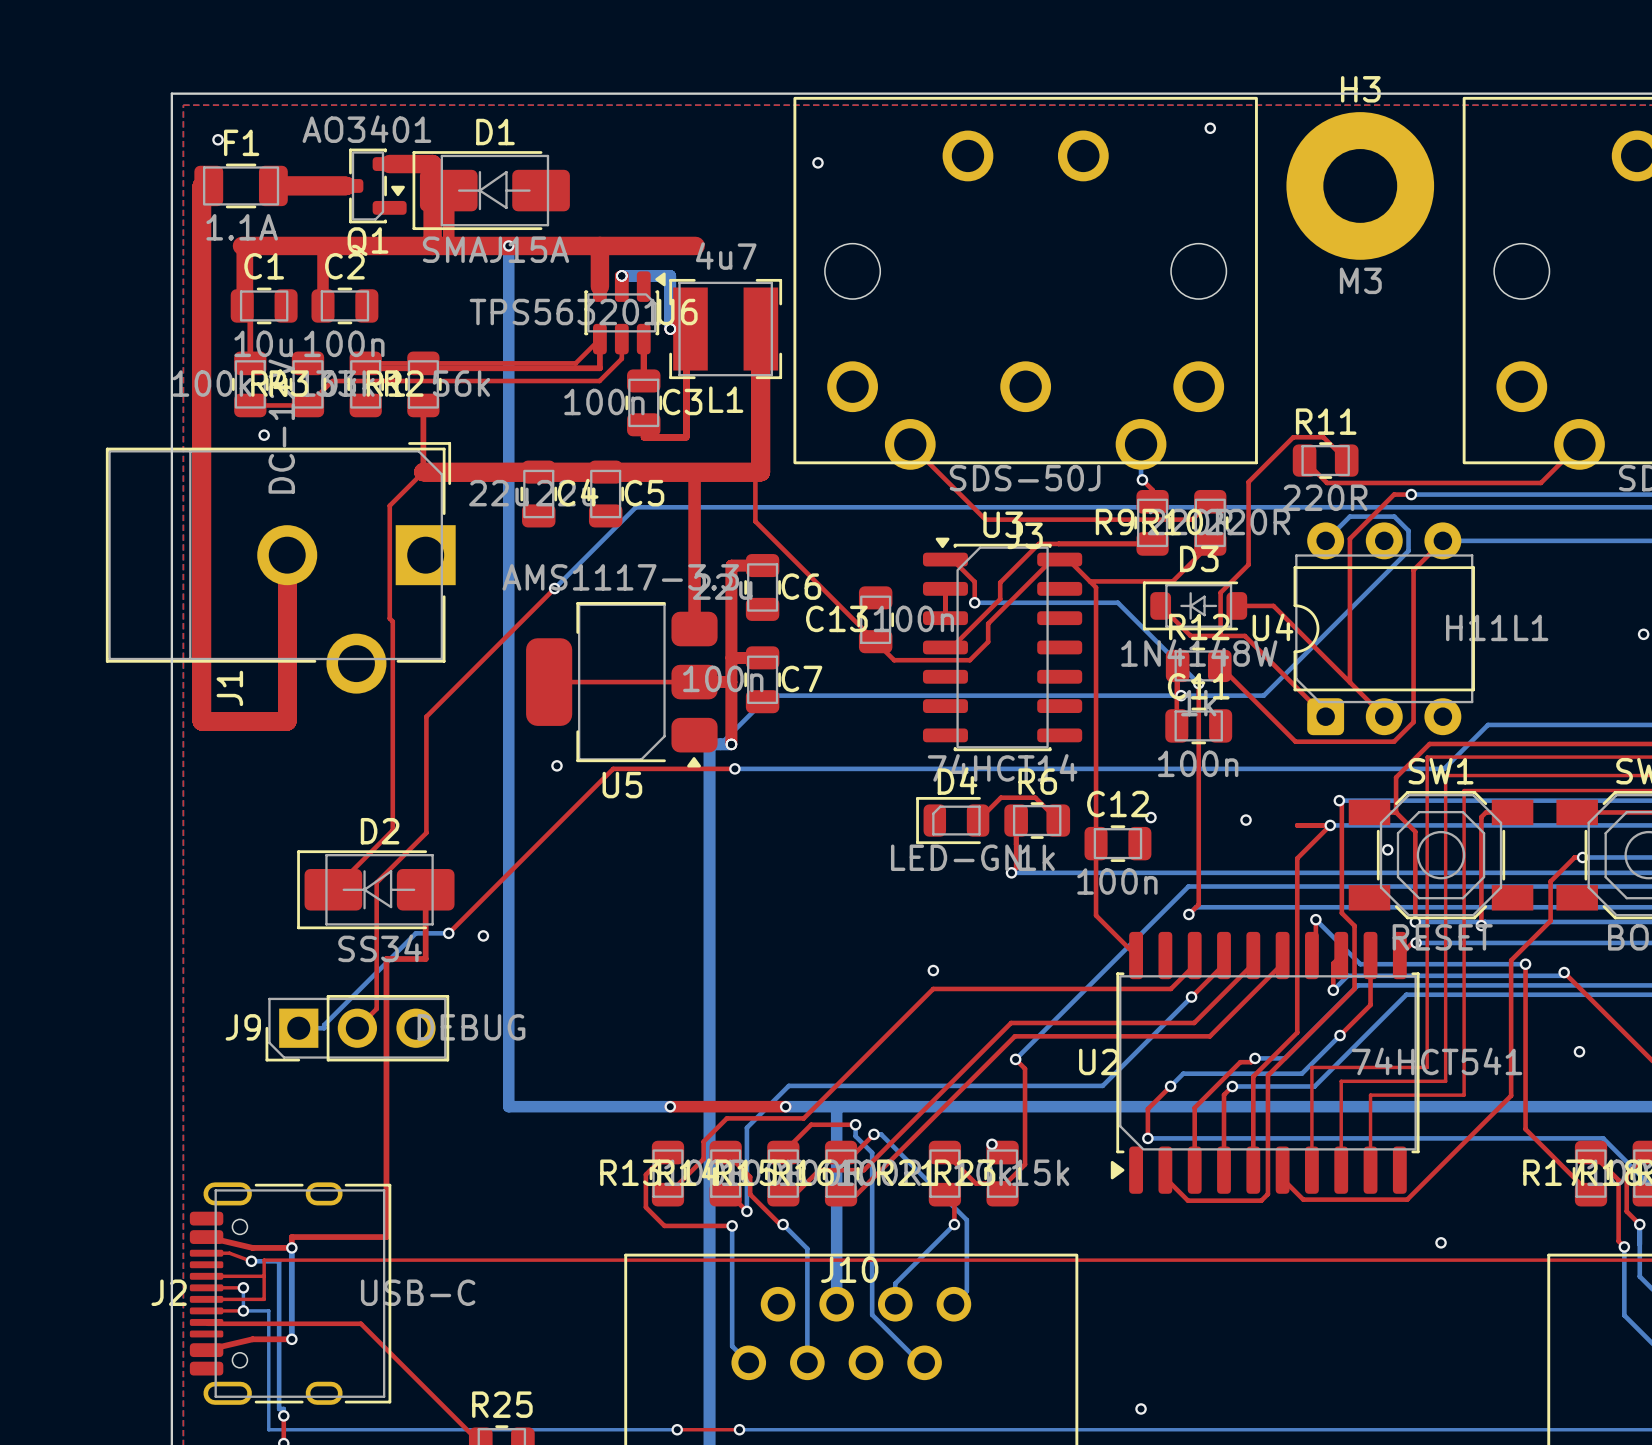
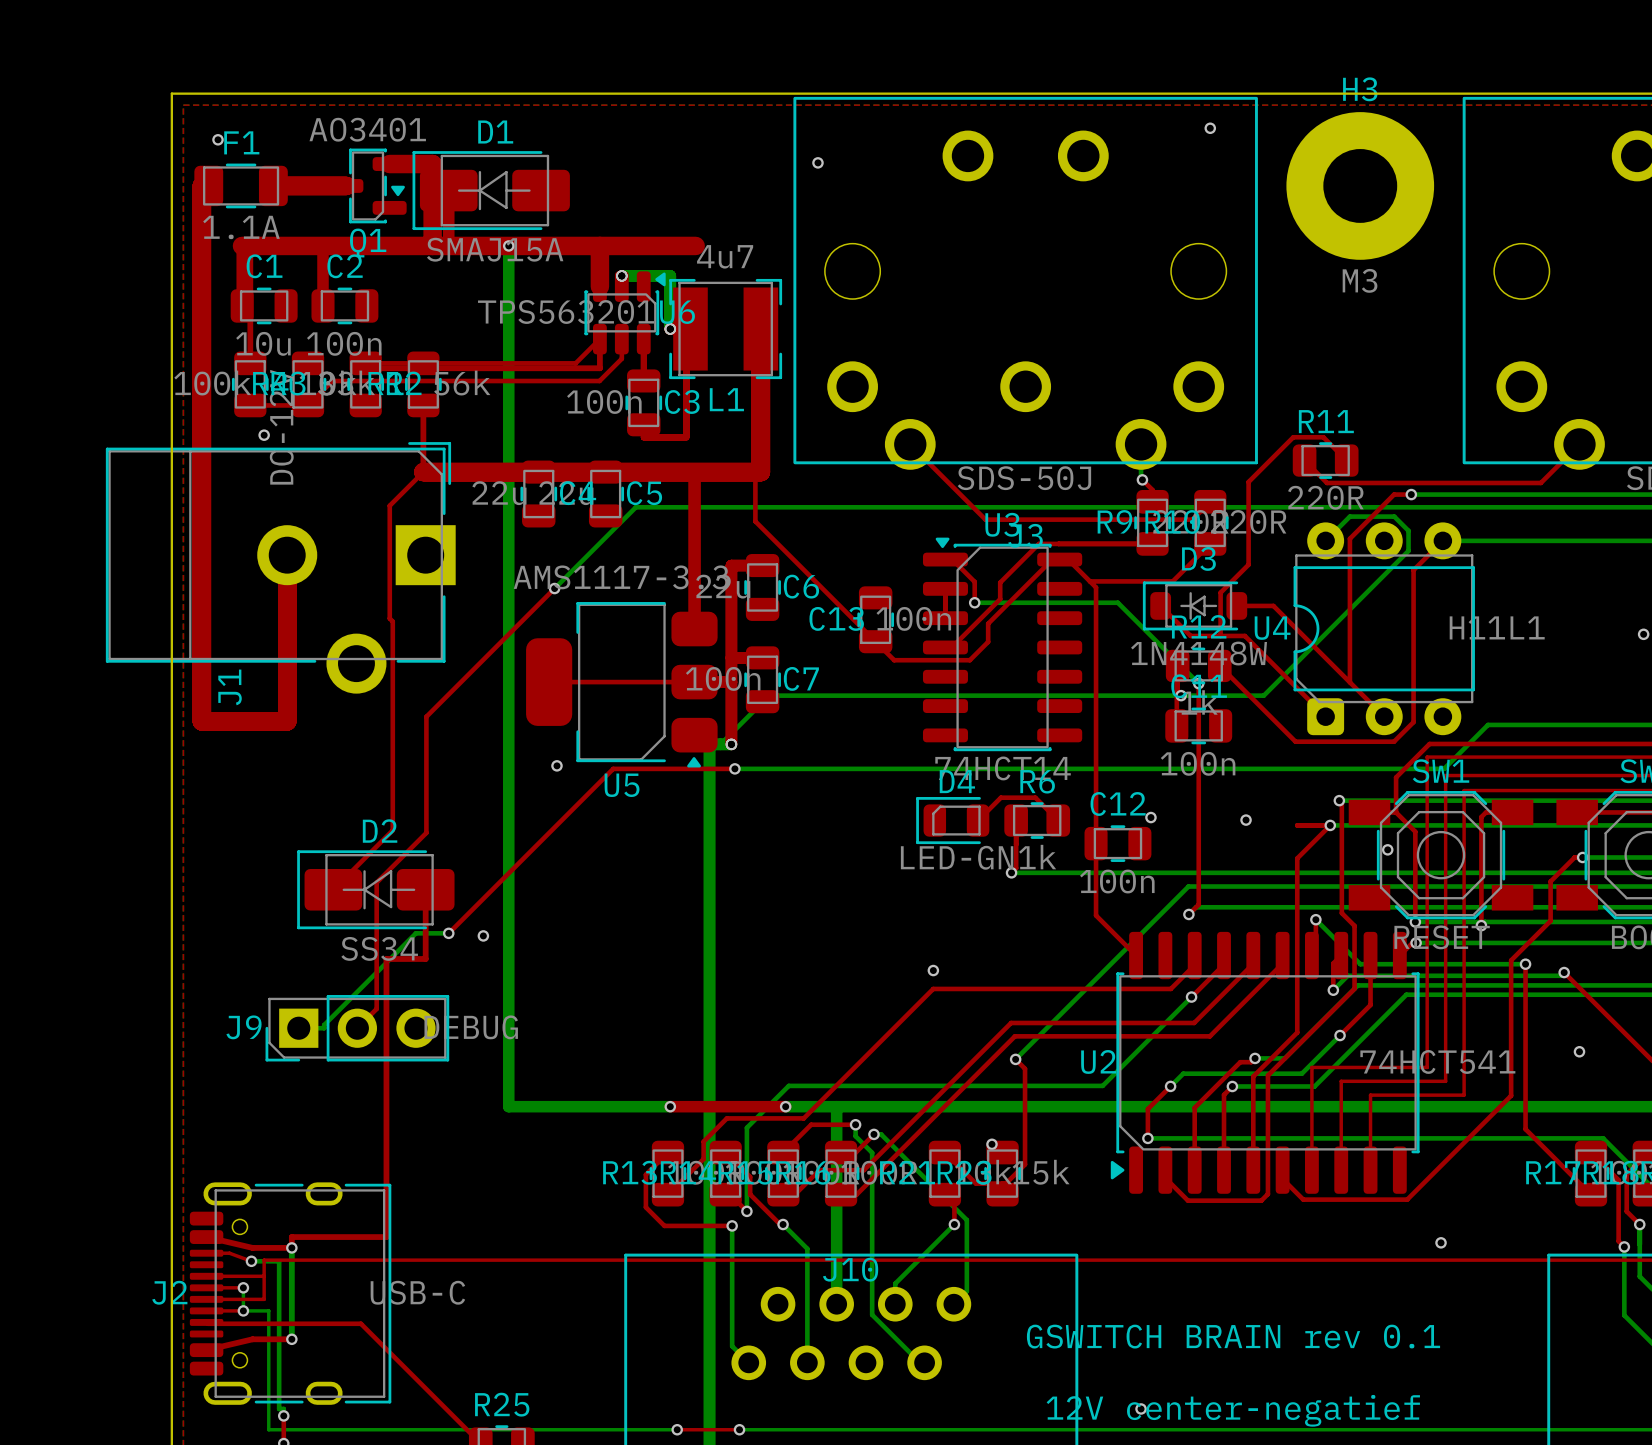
text: none -> GSWITCH BRAIN rev 0.1 (1233, 1336)
text: none -> 12V center-negatief (1233, 1410)

